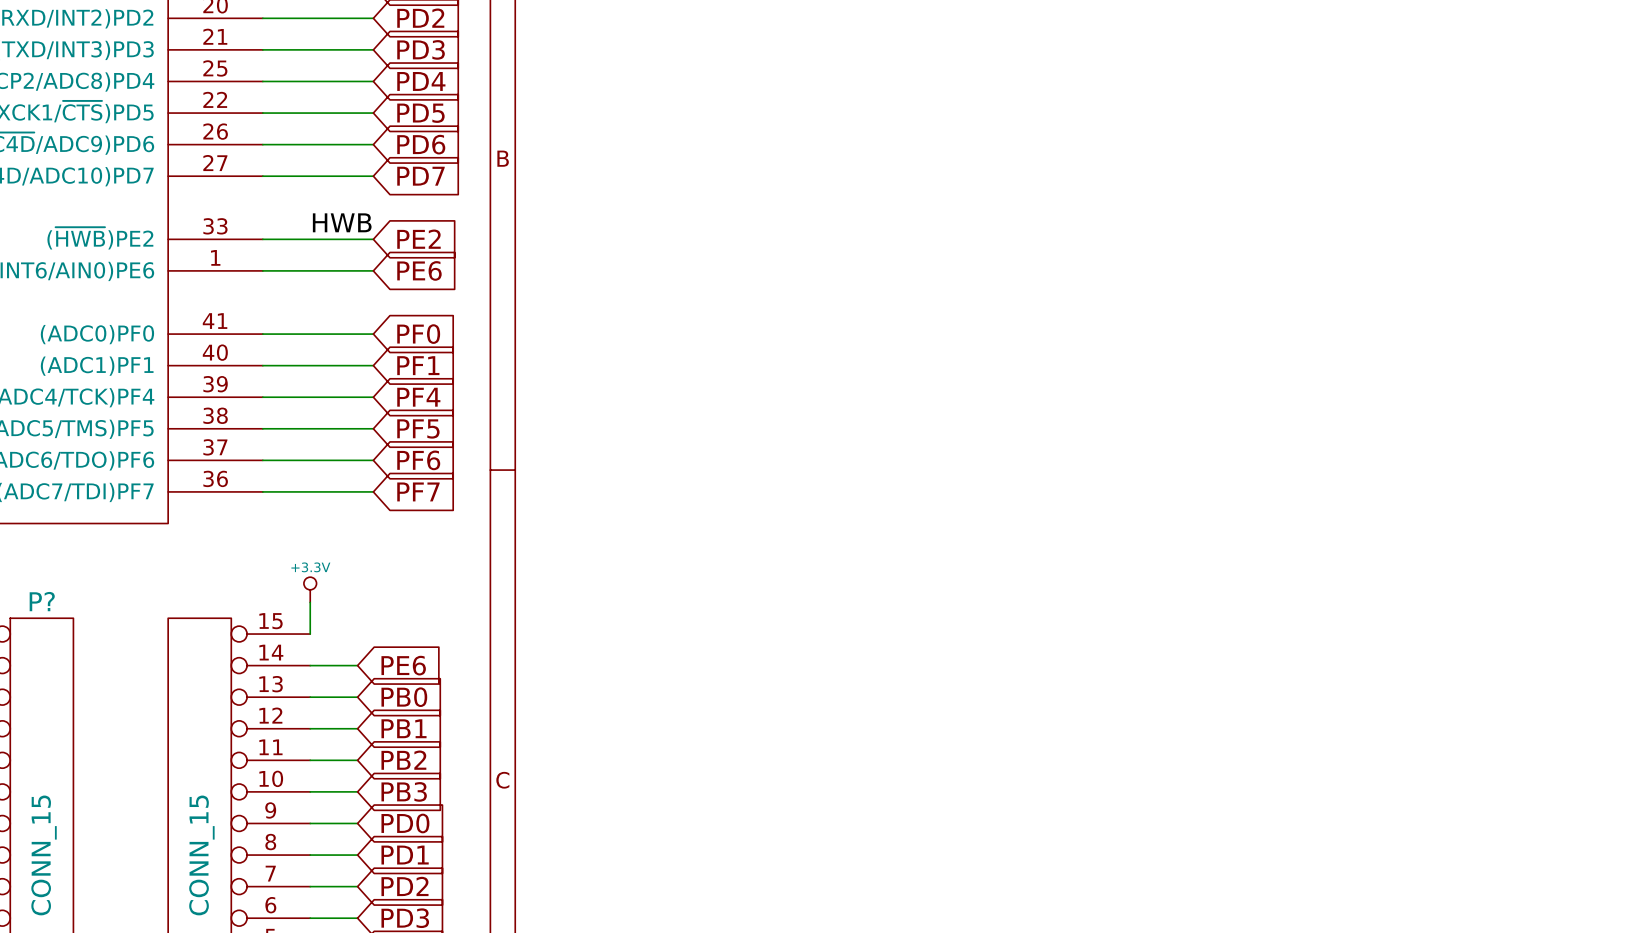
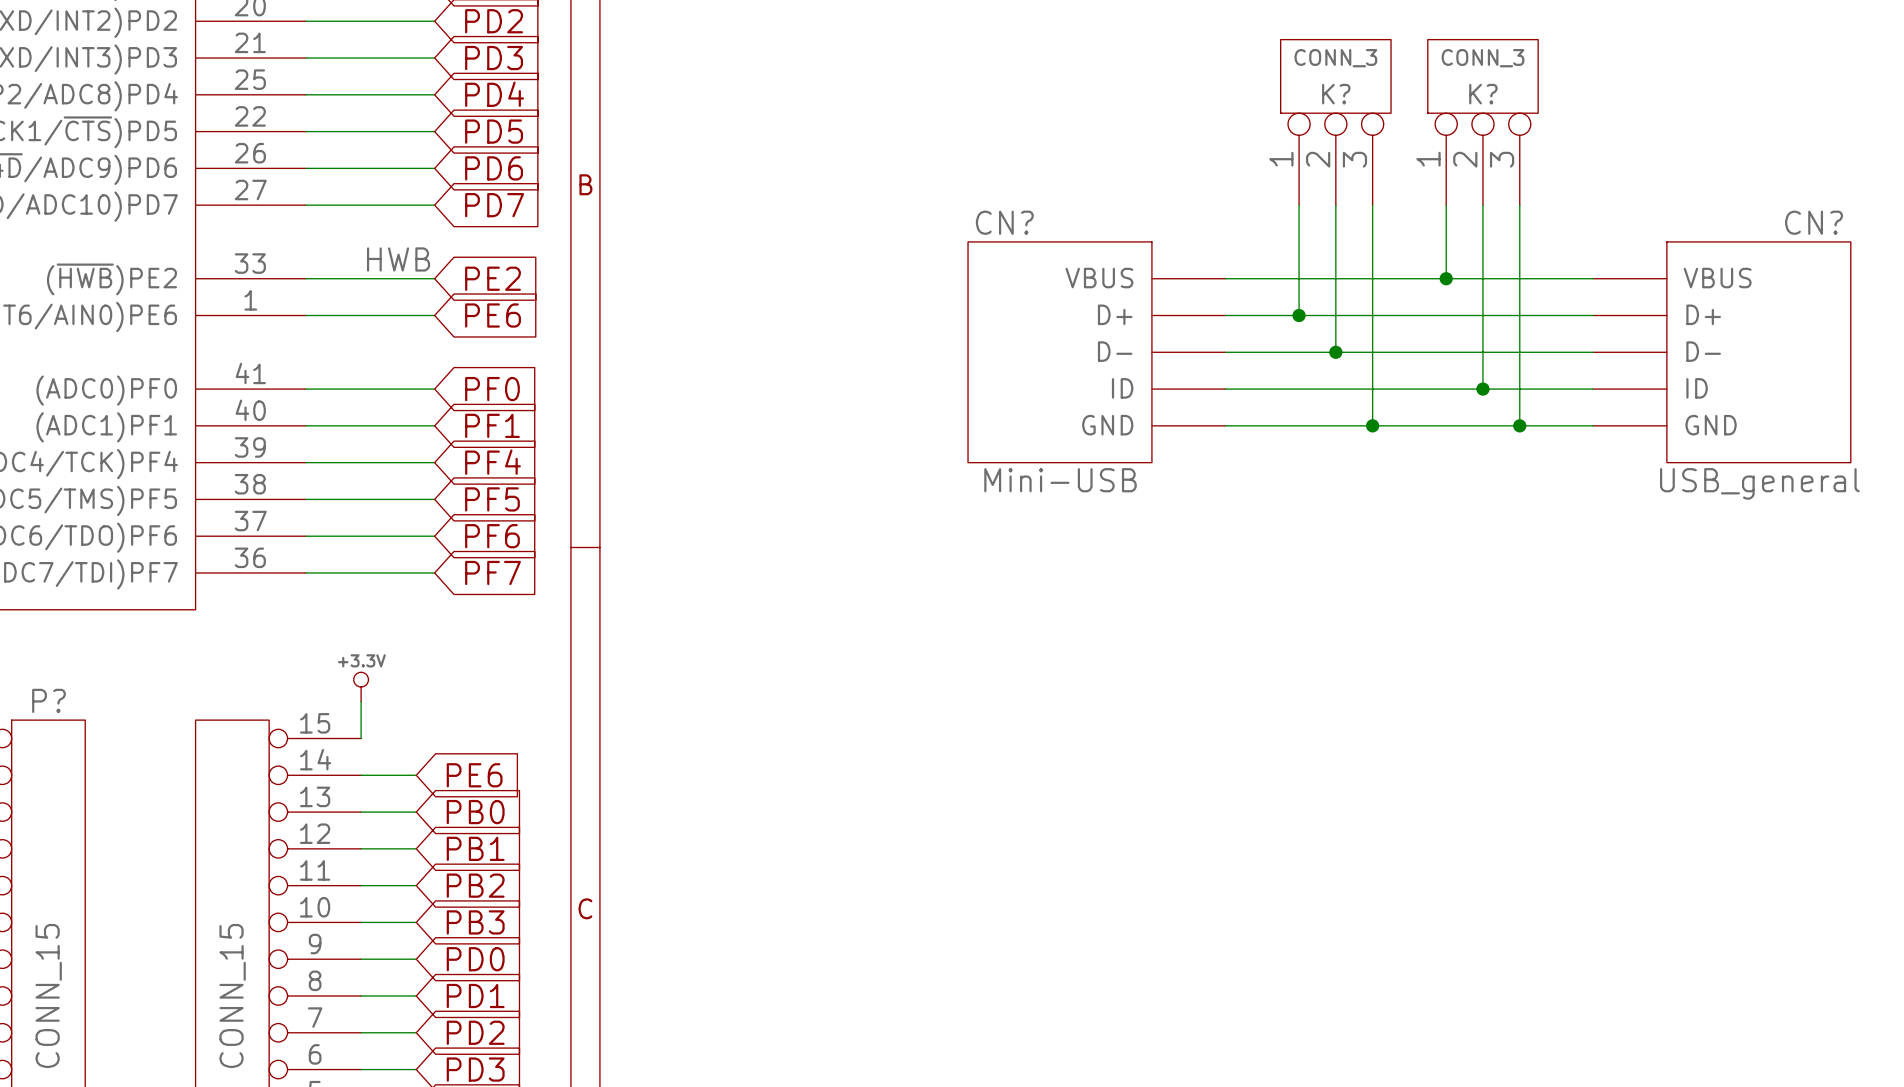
K?: none -> CONN_3 (1335, 122)
K?: none -> CONN_3 (1482, 122)
wire: none -> (1299, 205) (1299, 315)
wire: none -> (1335, 205) (1335, 352)
wire: none -> (1372, 205) (1372, 425)
wire: none -> (1446, 205) (1446, 278)
wire: none -> (1482, 205) (1482, 389)
wire: none -> (1519, 205) (1519, 425)
wire: none -> (1225, 278) (1593, 278)
junction: none -> (1446, 278)
wire: none -> (1225, 315) (1593, 315)
junction: none -> (1299, 315)
CN?: none -> Mini-USB (1096, 352)
wire: none -> (1225, 352) (1593, 352)
junction: none -> (1335, 352)
CN?: none -> USB_general (1722, 352)
wire: none -> (1225, 389) (1593, 389)
junction: none -> (1482, 389)
wire: none -> (1225, 425) (1593, 425)
junction: none -> (1372, 425)
junction: none -> (1519, 425)

